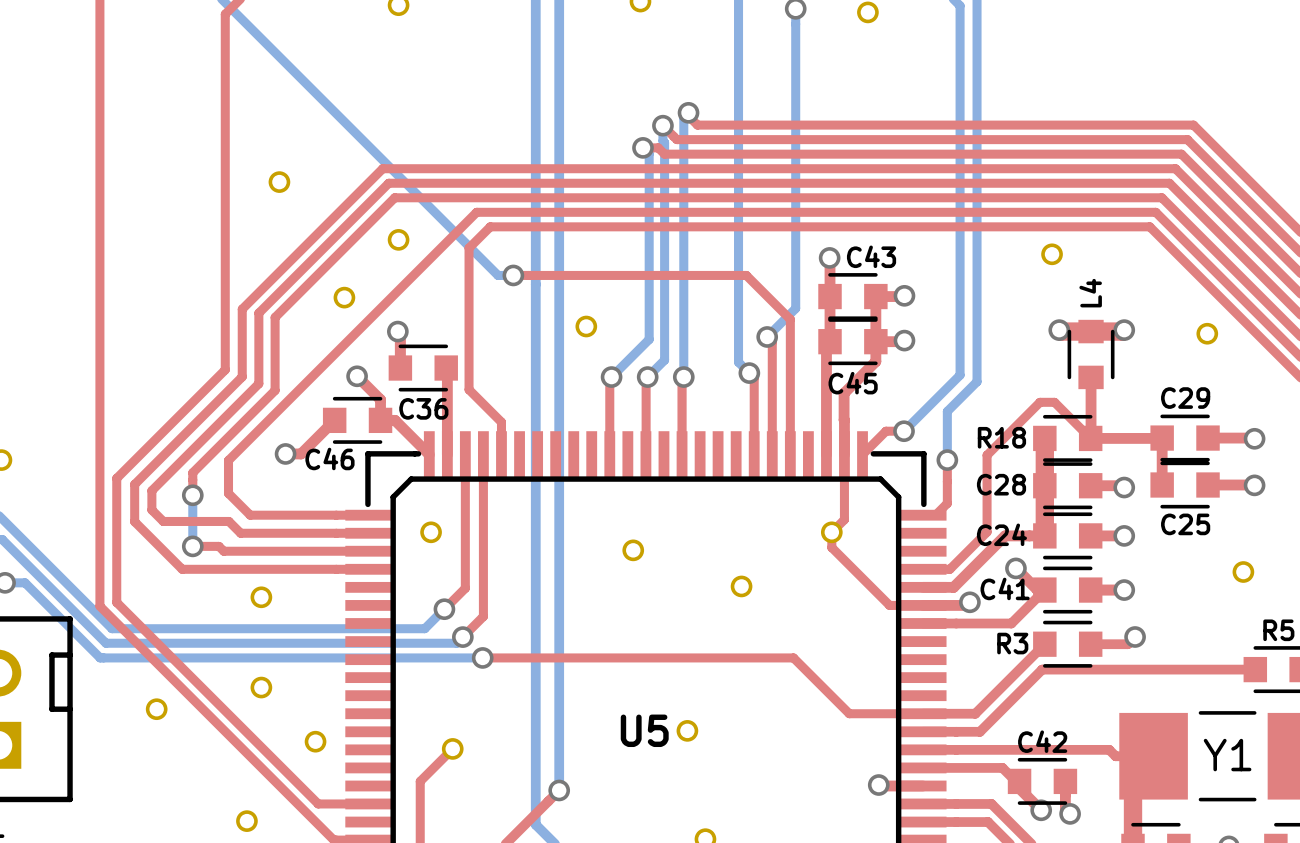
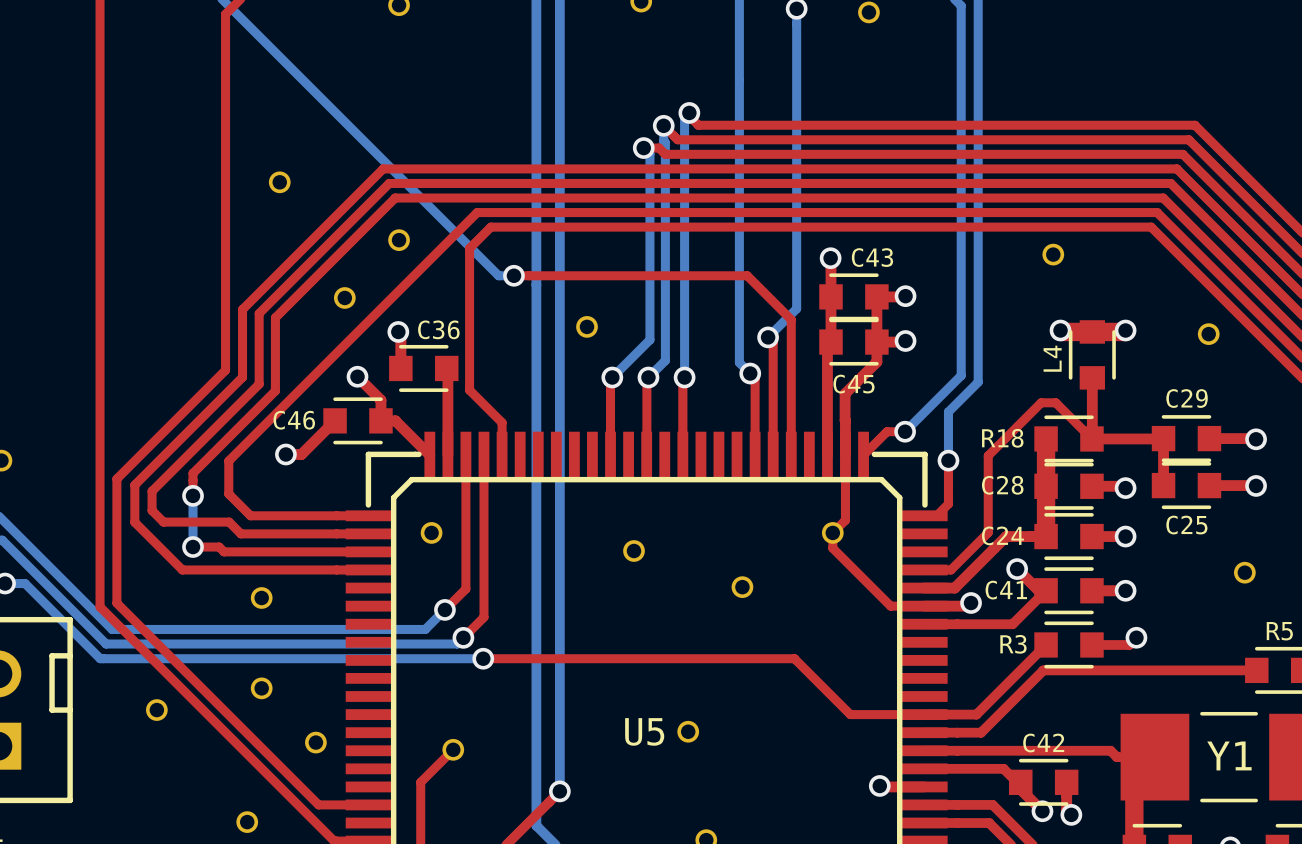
L4 name position: L4 (1090, 293) -> L4 (1052, 358)
C36 name position: C36 (423, 408) -> C36 (438, 329)
C46 name position: C46 (329, 458) -> C46 (294, 420)

